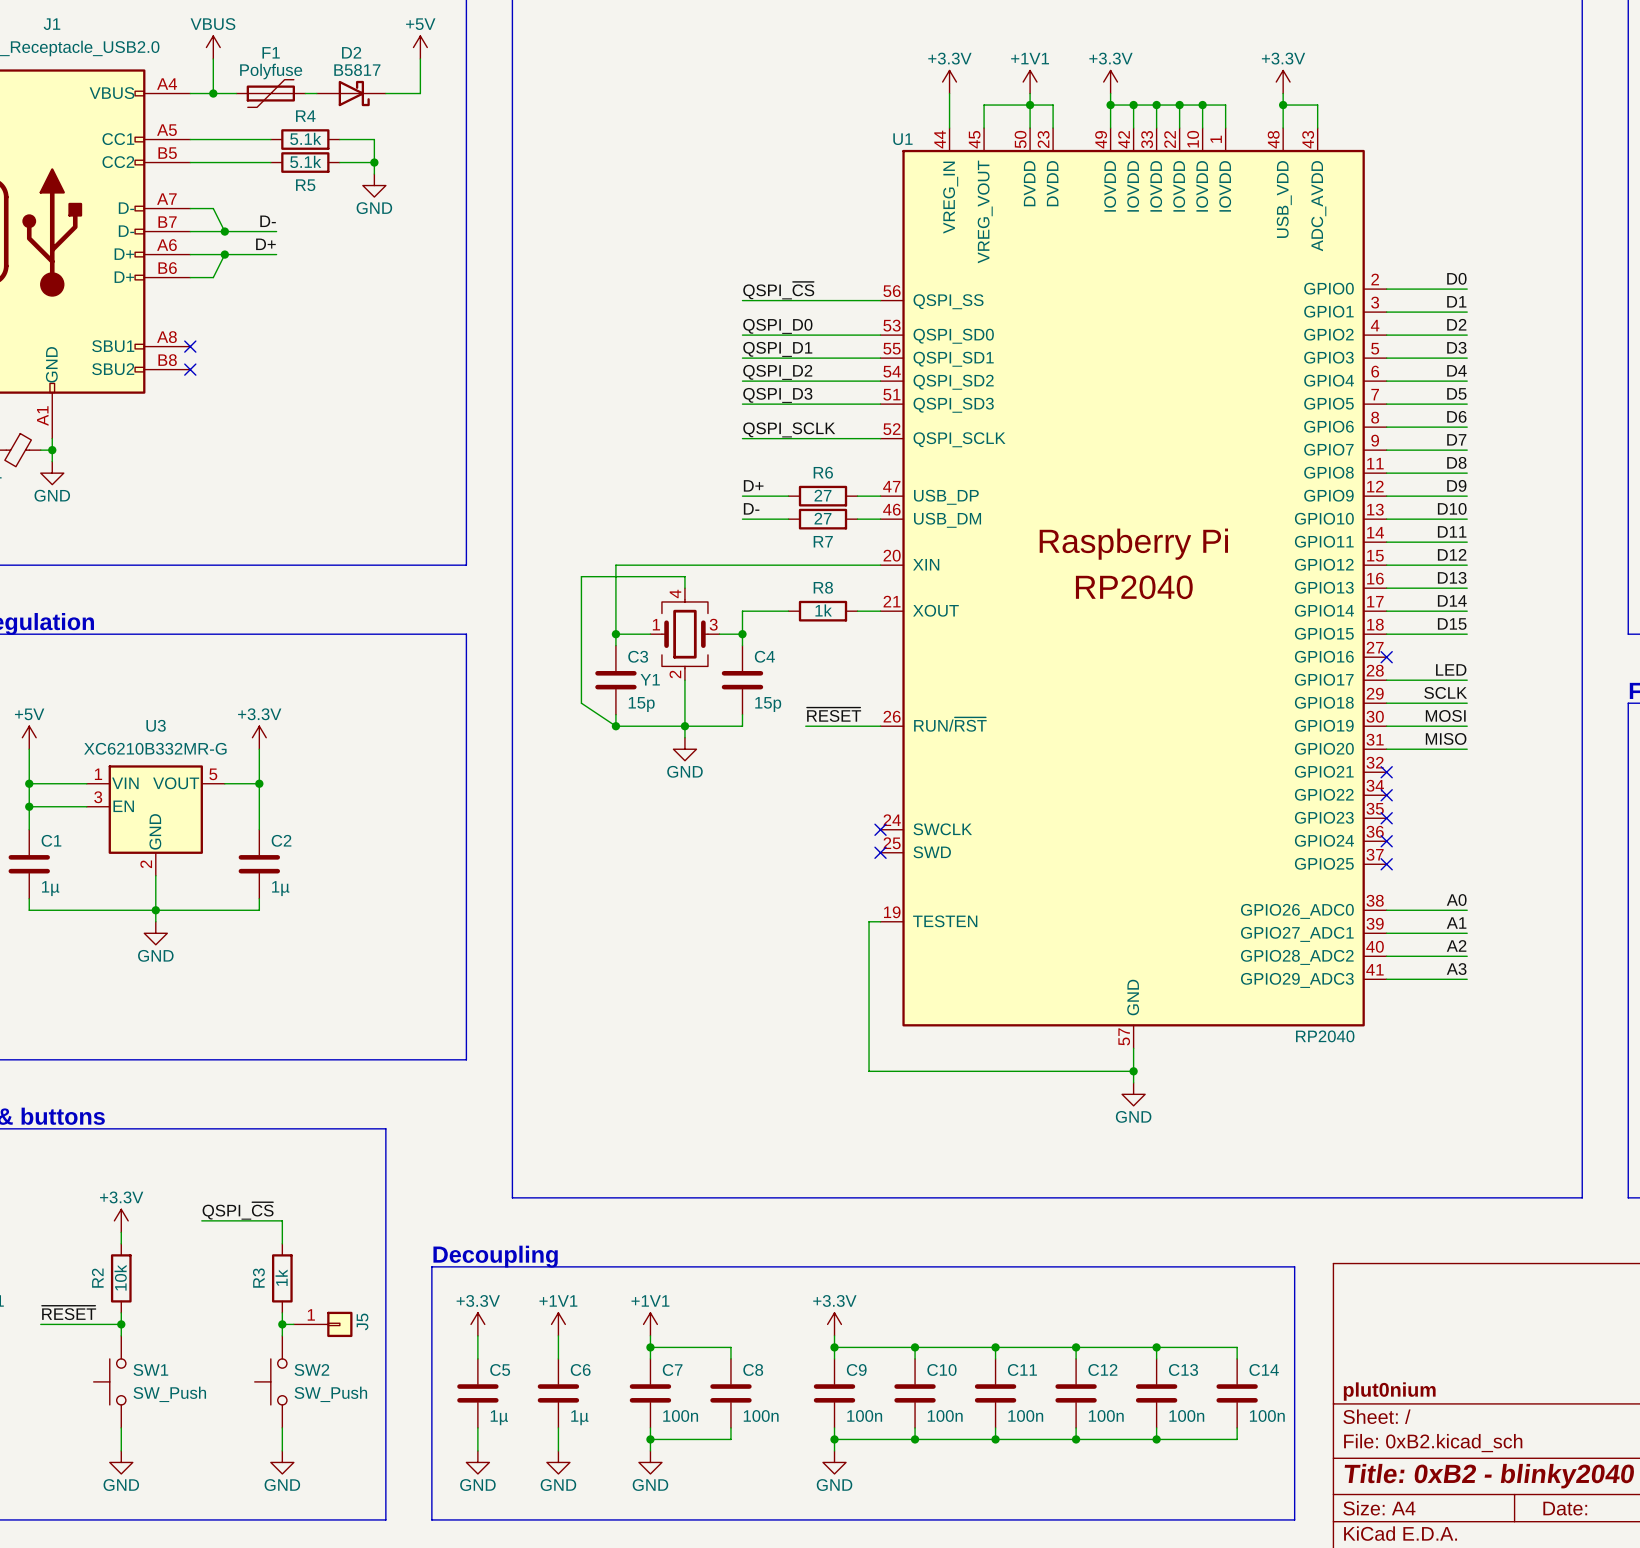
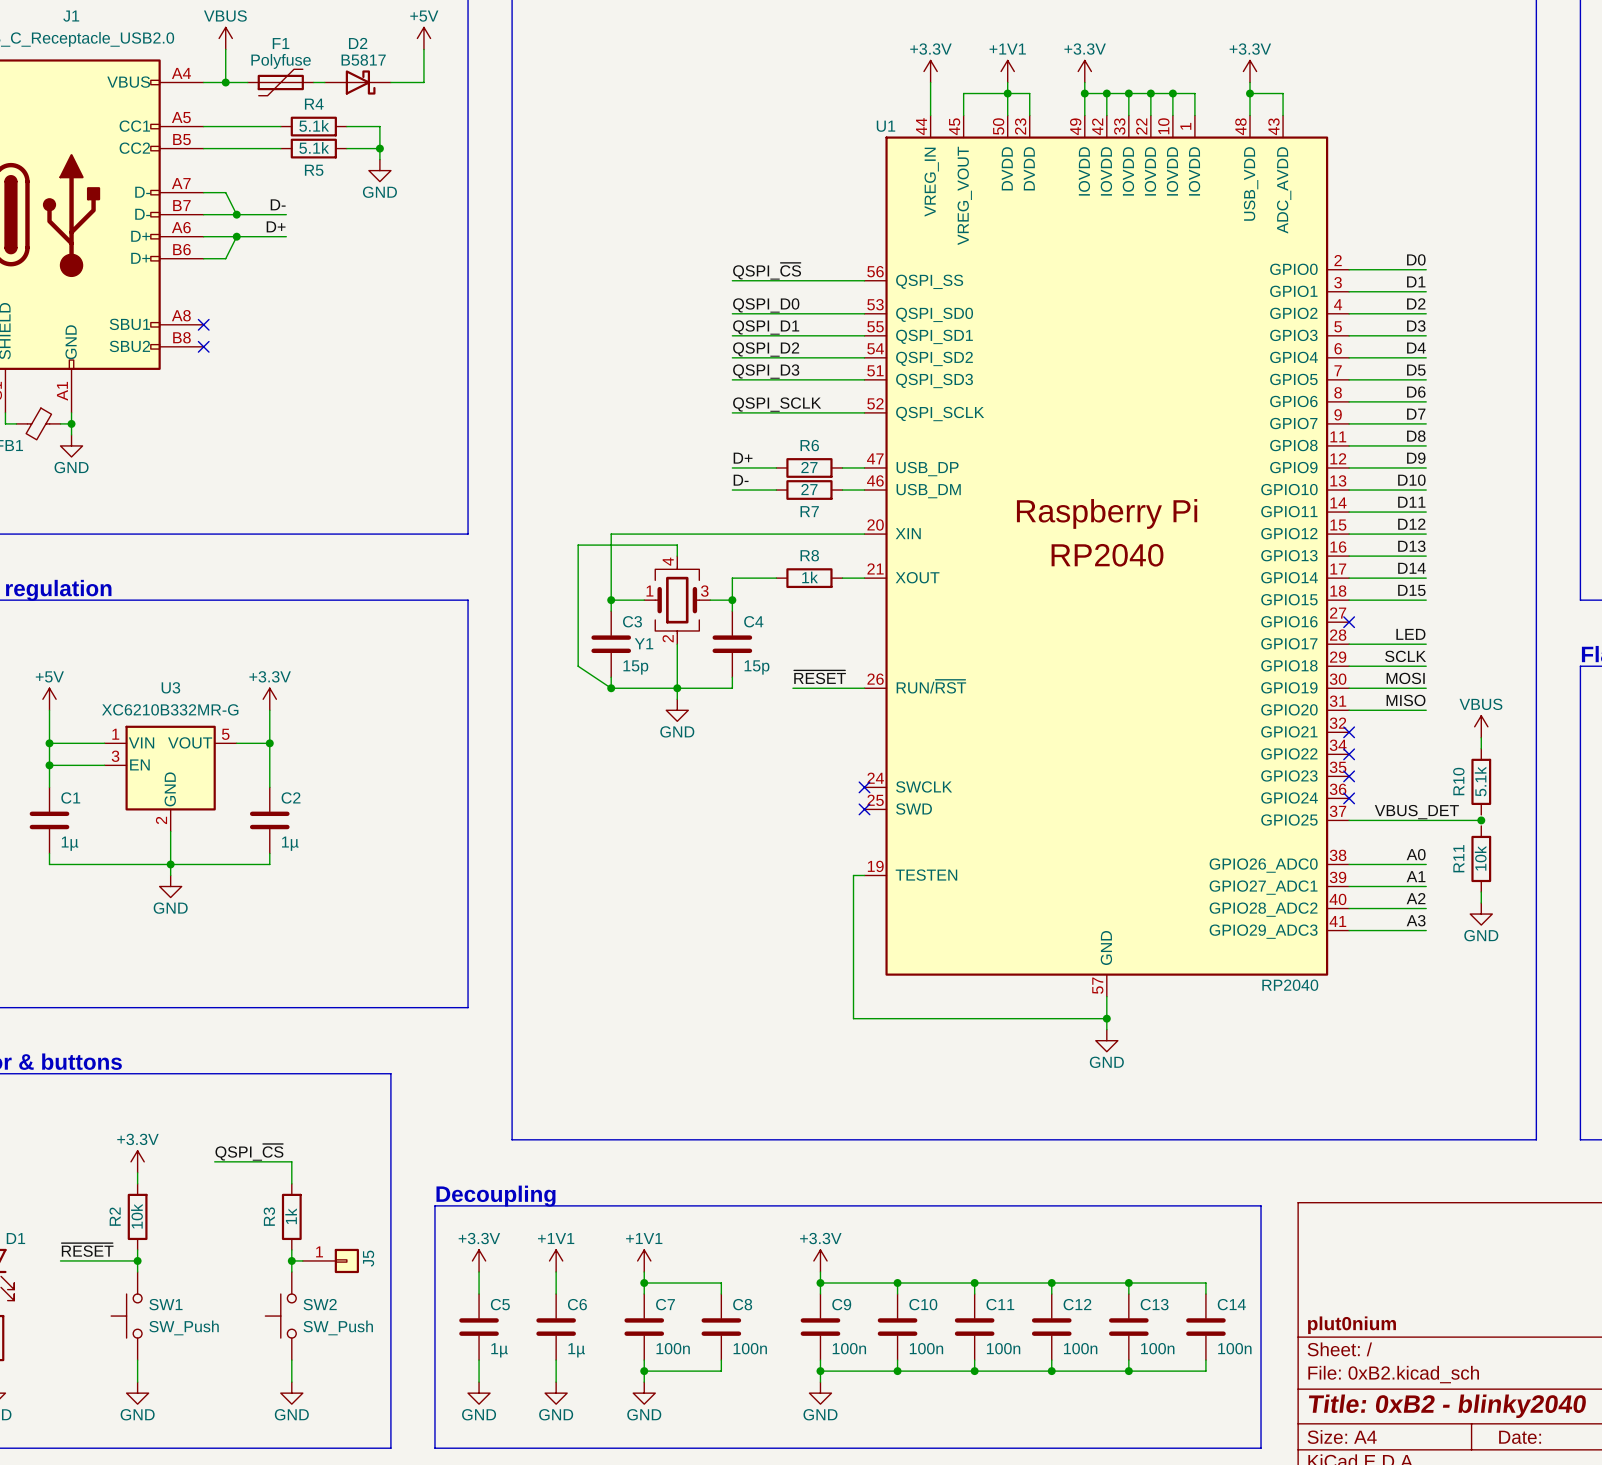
power symbol: none -> VBUS (1481, 726)
wire: none -> (1481, 737) (1481, 748)
R10: none -> 5.1k (1481, 781)
label: none -> VBUS_DET (1416, 812)
wire: none -> (1349, 820) (1481, 820)
no-connect mark: (1386, 864) -> none
junction: none -> (1481, 820)
R11: none -> 10k (1481, 858)
wire: none -> (1481, 892) (1481, 903)
power symbol: none -> GND (1481, 914)

